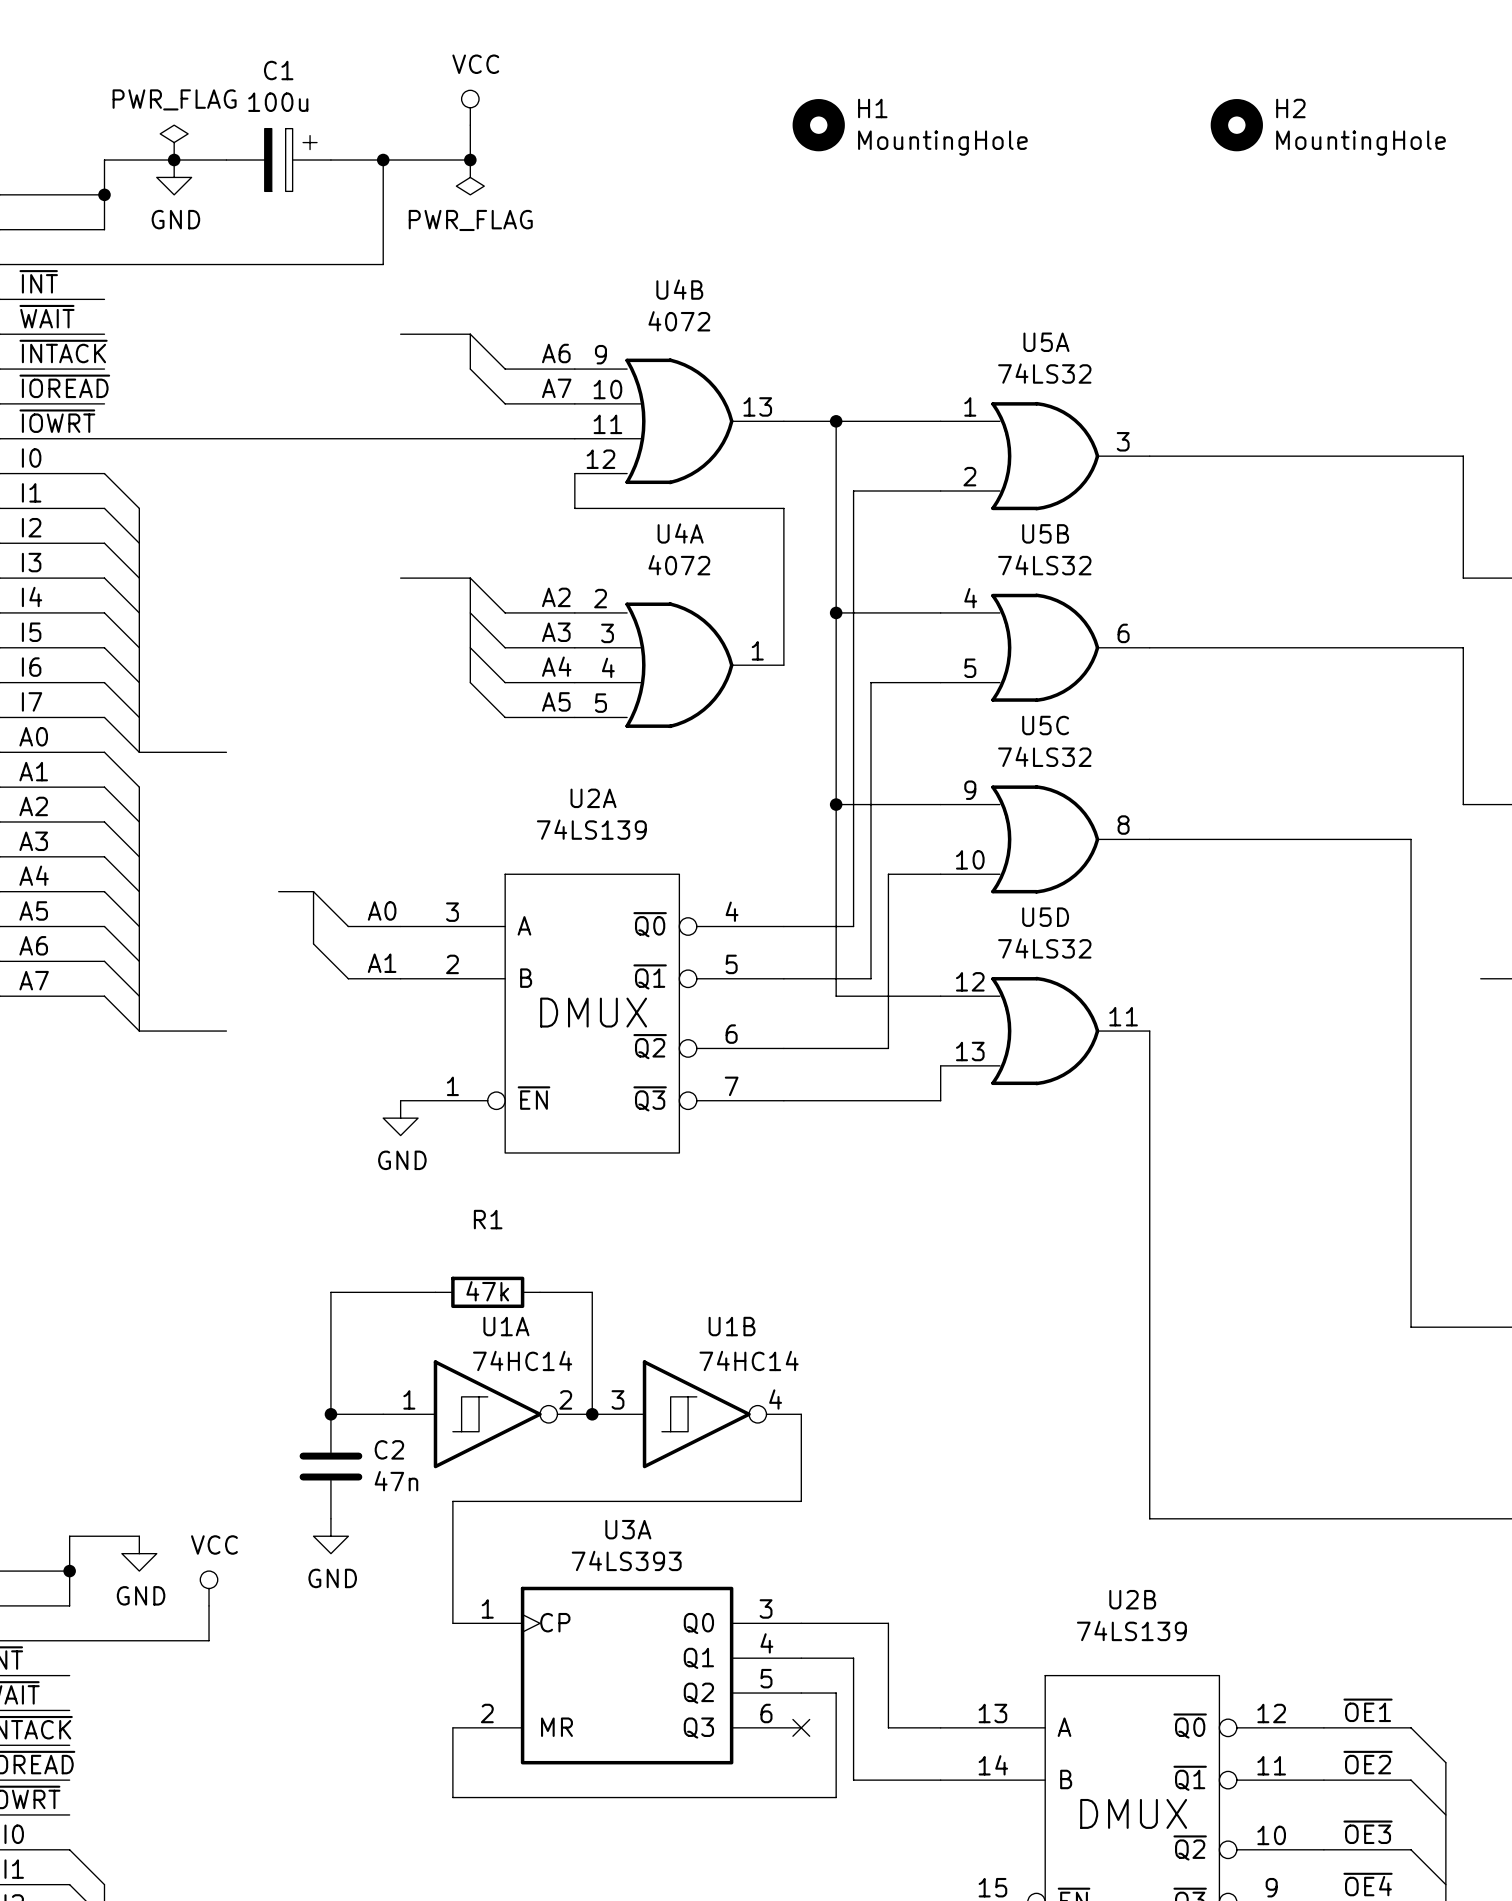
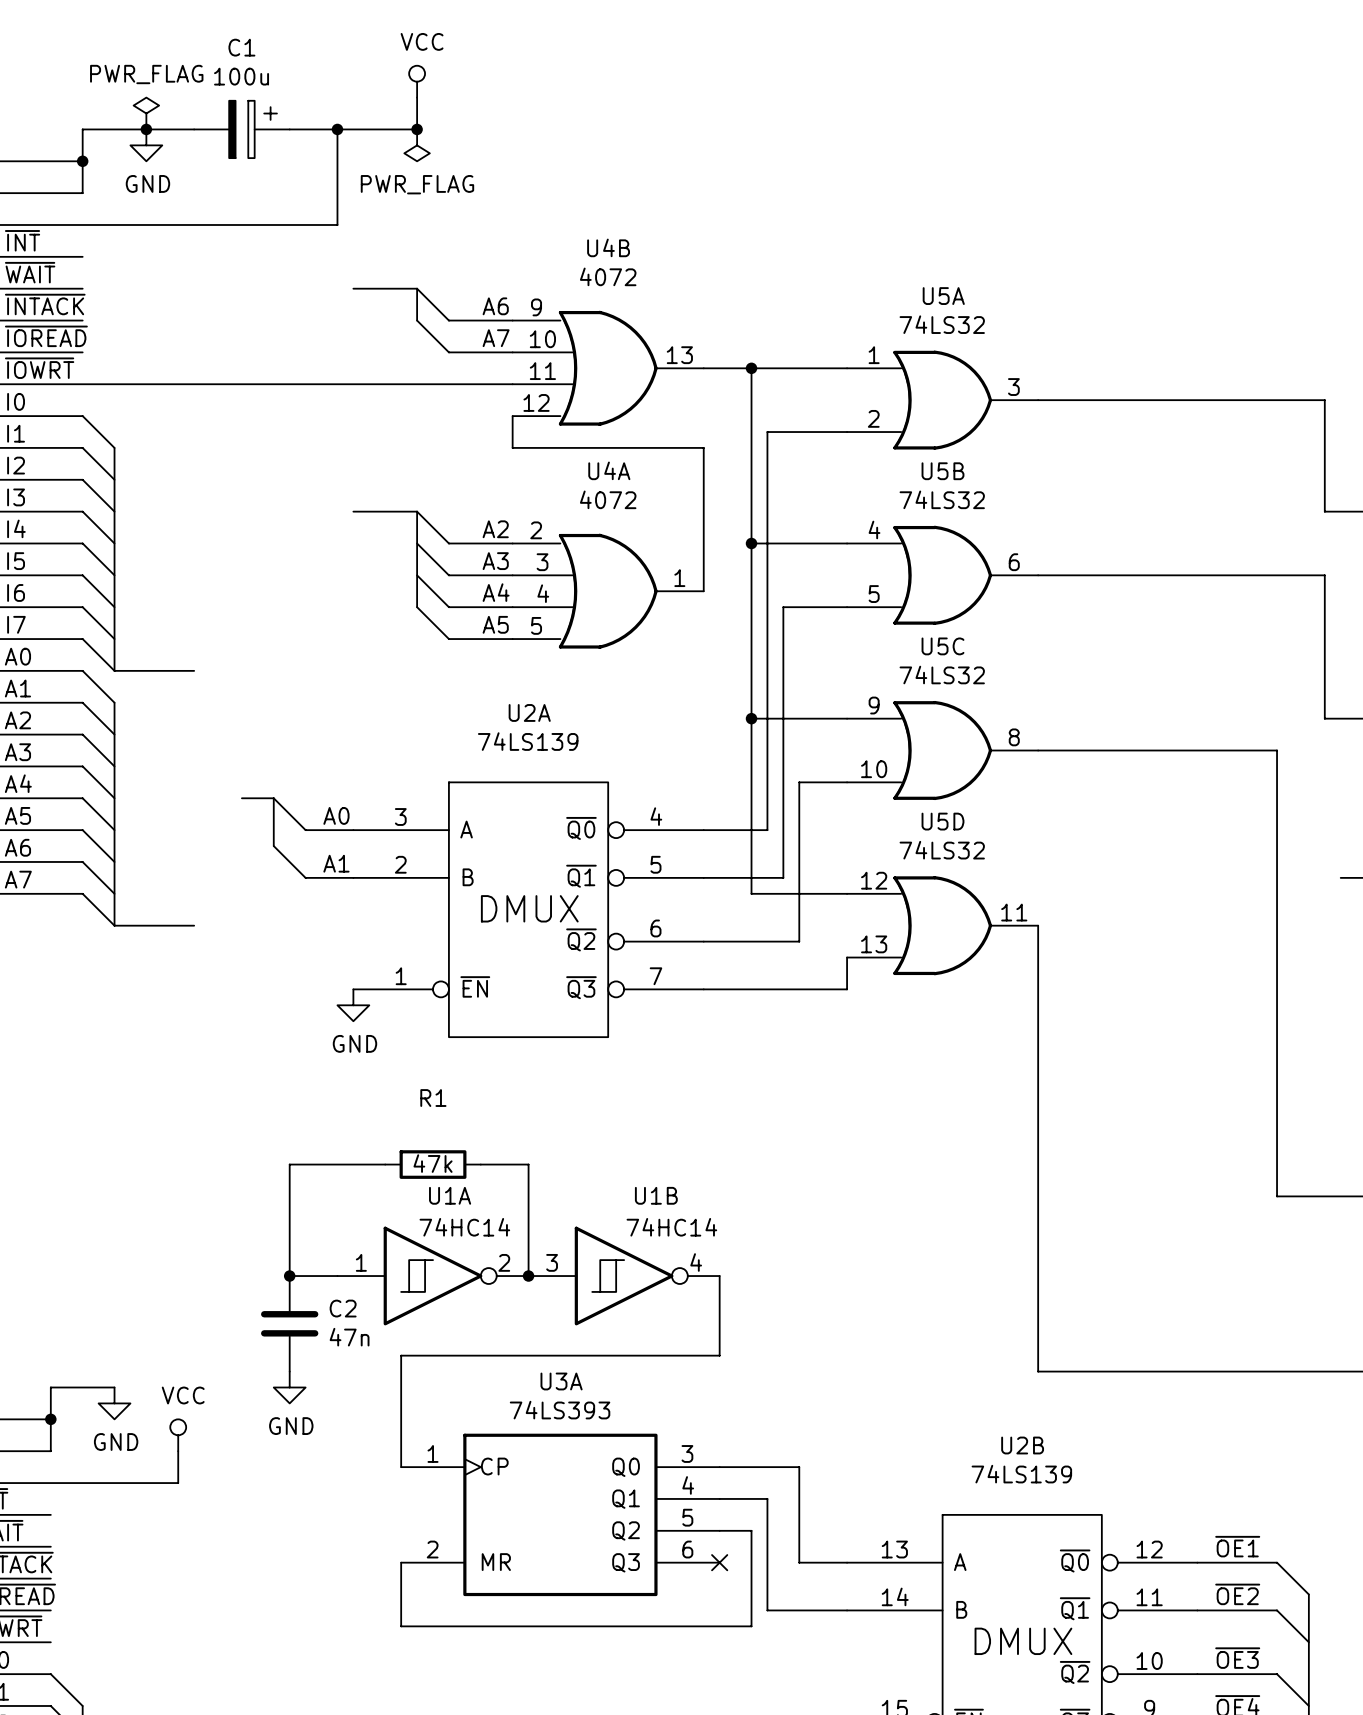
H1: MountingHole (818, 125) -> none
H2: MountingHole (1236, 125) -> none

